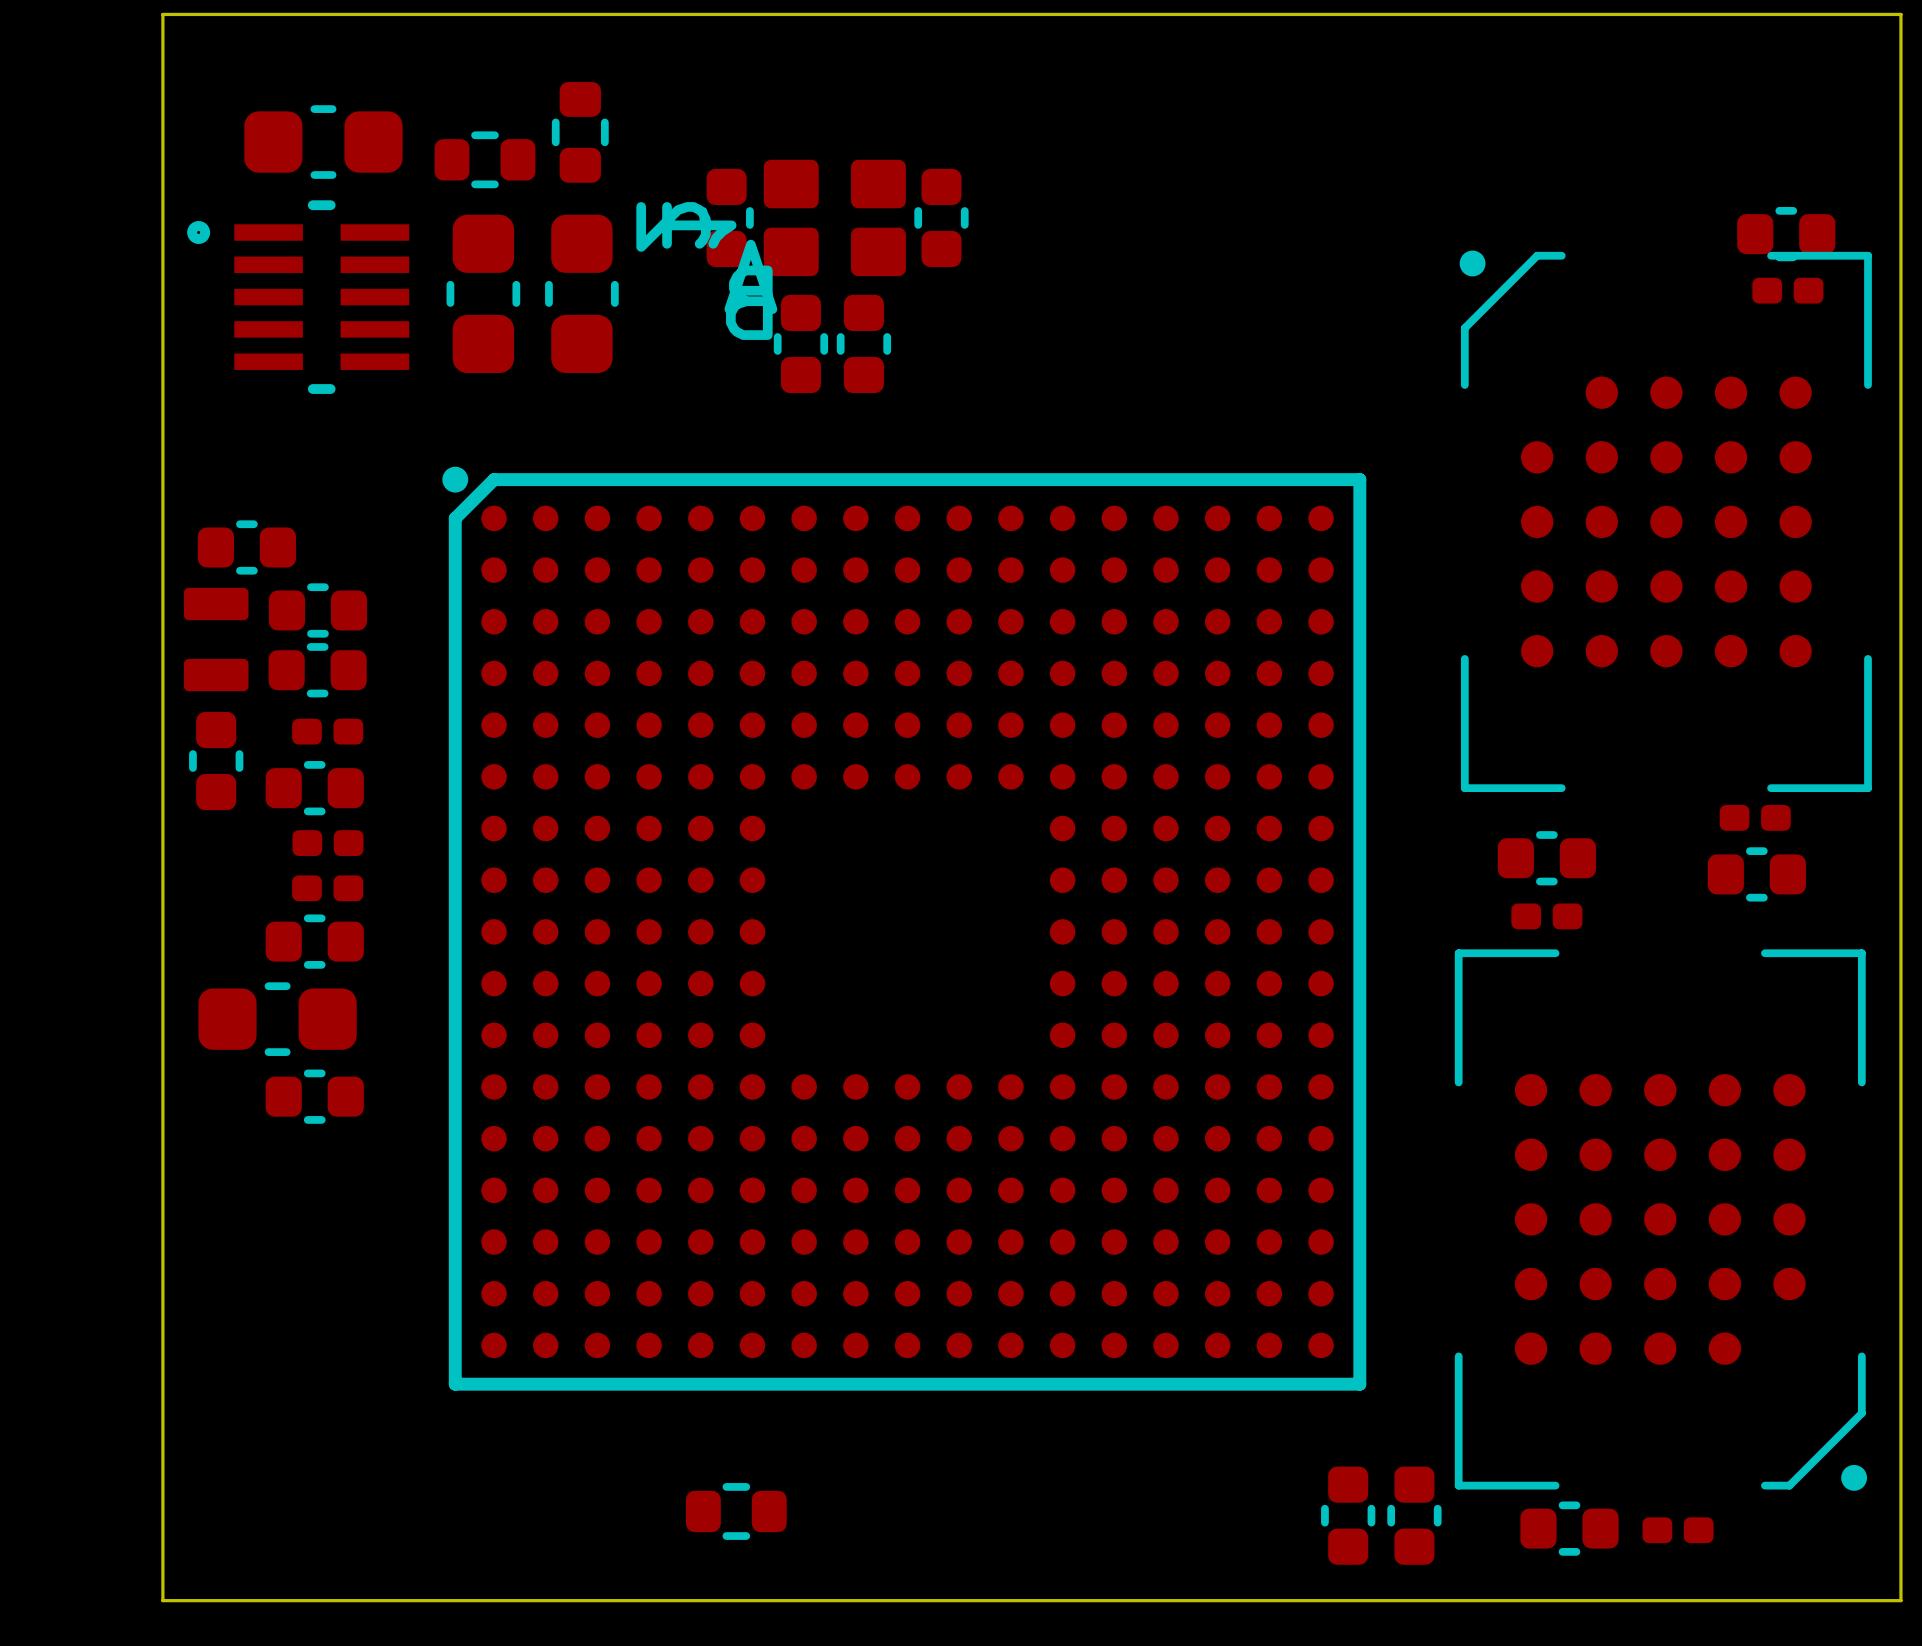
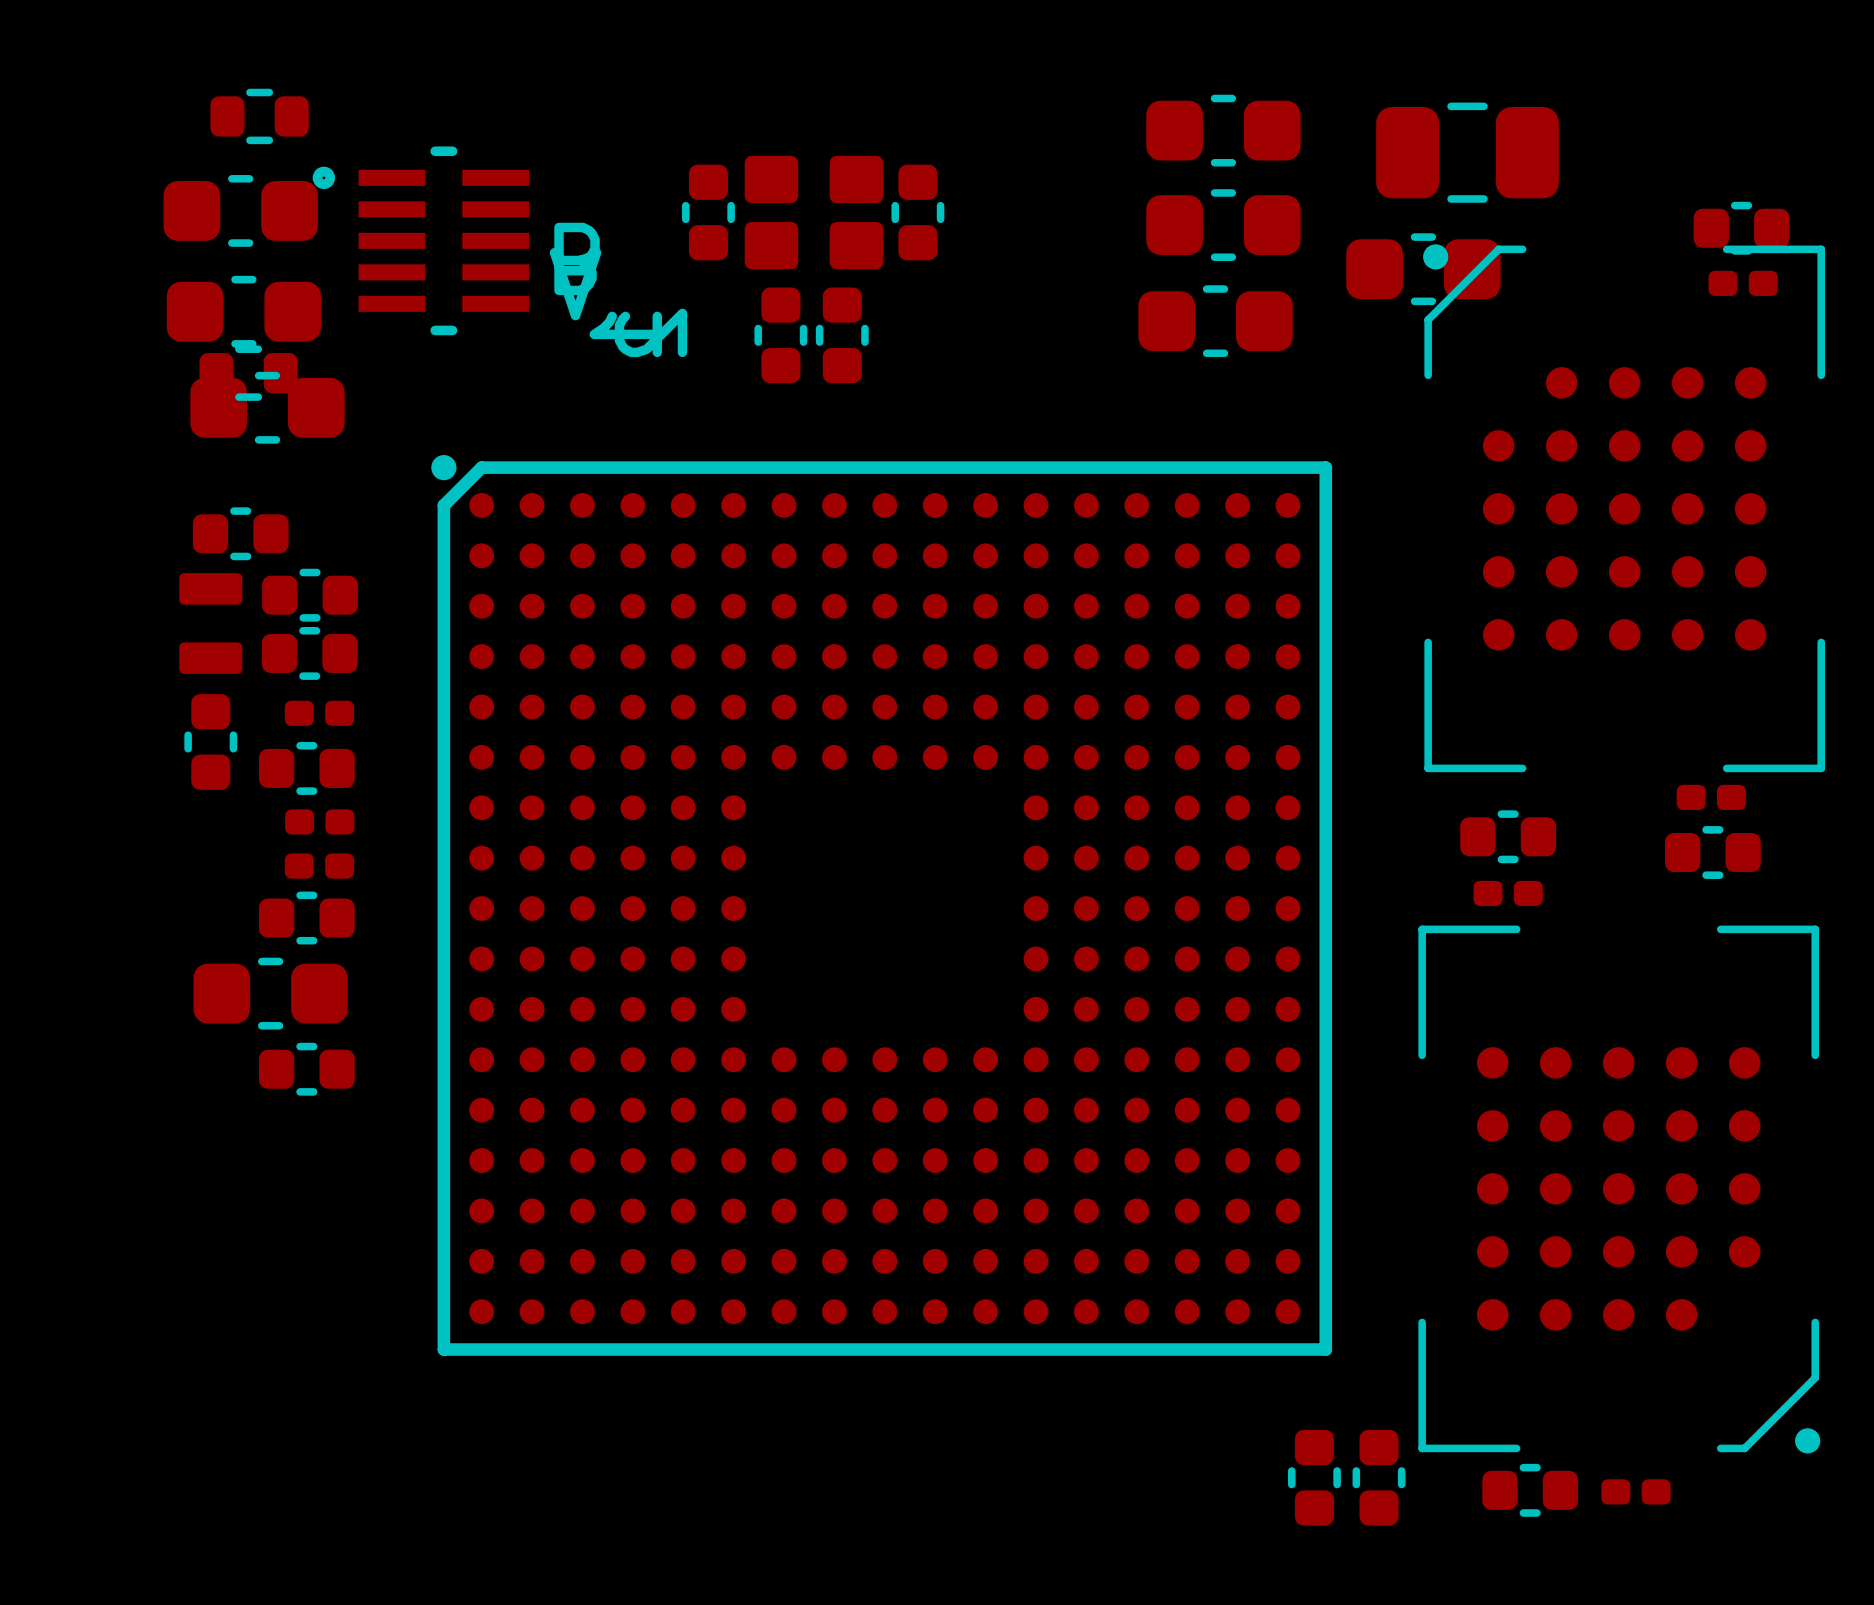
board edge: (162, 14) (1900, 14) (1900, 1600) (162, 1600) (162, 14) -> none
part: none -> (259, 116)
part: (580, 132) -> none
part: none -> (1223, 130)
part: (323, 142) -> none
part: none -> (1467, 152)
part: (484, 159) -> none
part: none -> (240, 210)
part: none -> (1223, 225)
part rotation: 0° (706, 271) -> 180° (618, 289)
part: none -> (1423, 269)
part: (483, 293) -> none
part: (581, 293) -> none
part position: (298, 297) -> (420, 240)
part: none -> (243, 311)
part: none -> (1215, 321)
part: none -> (248, 373)
part: none -> (267, 407)
part: (736, 1511) -> none

